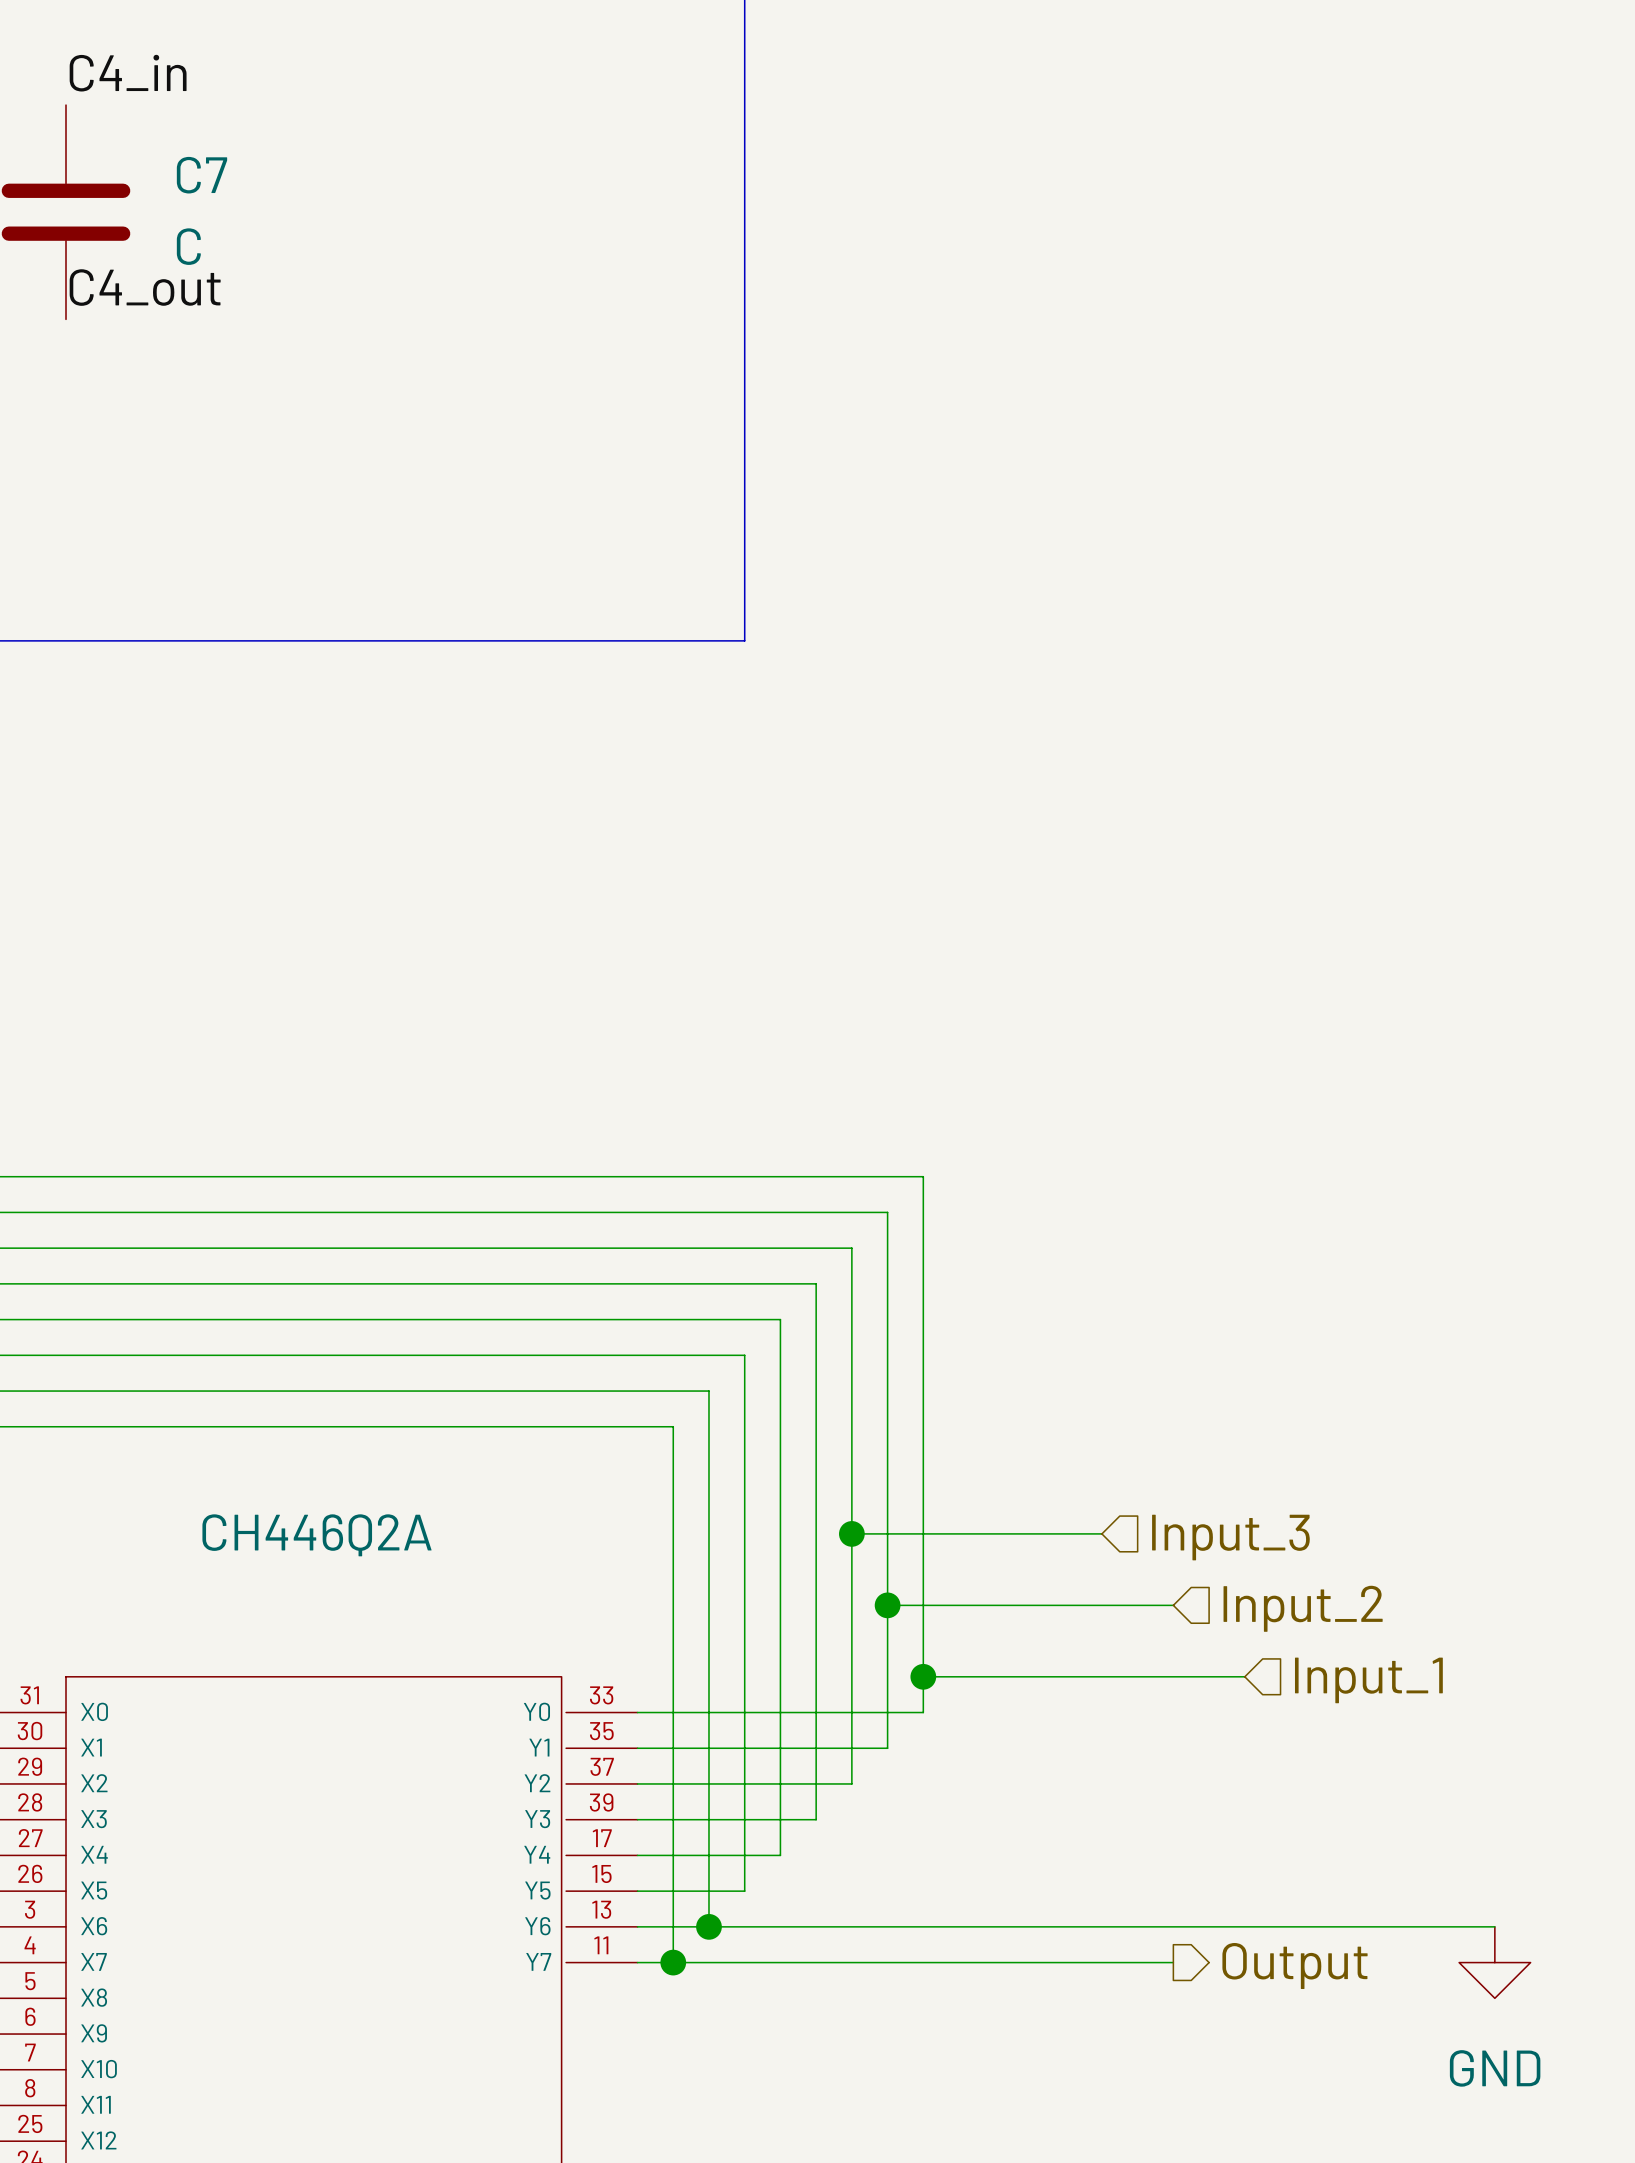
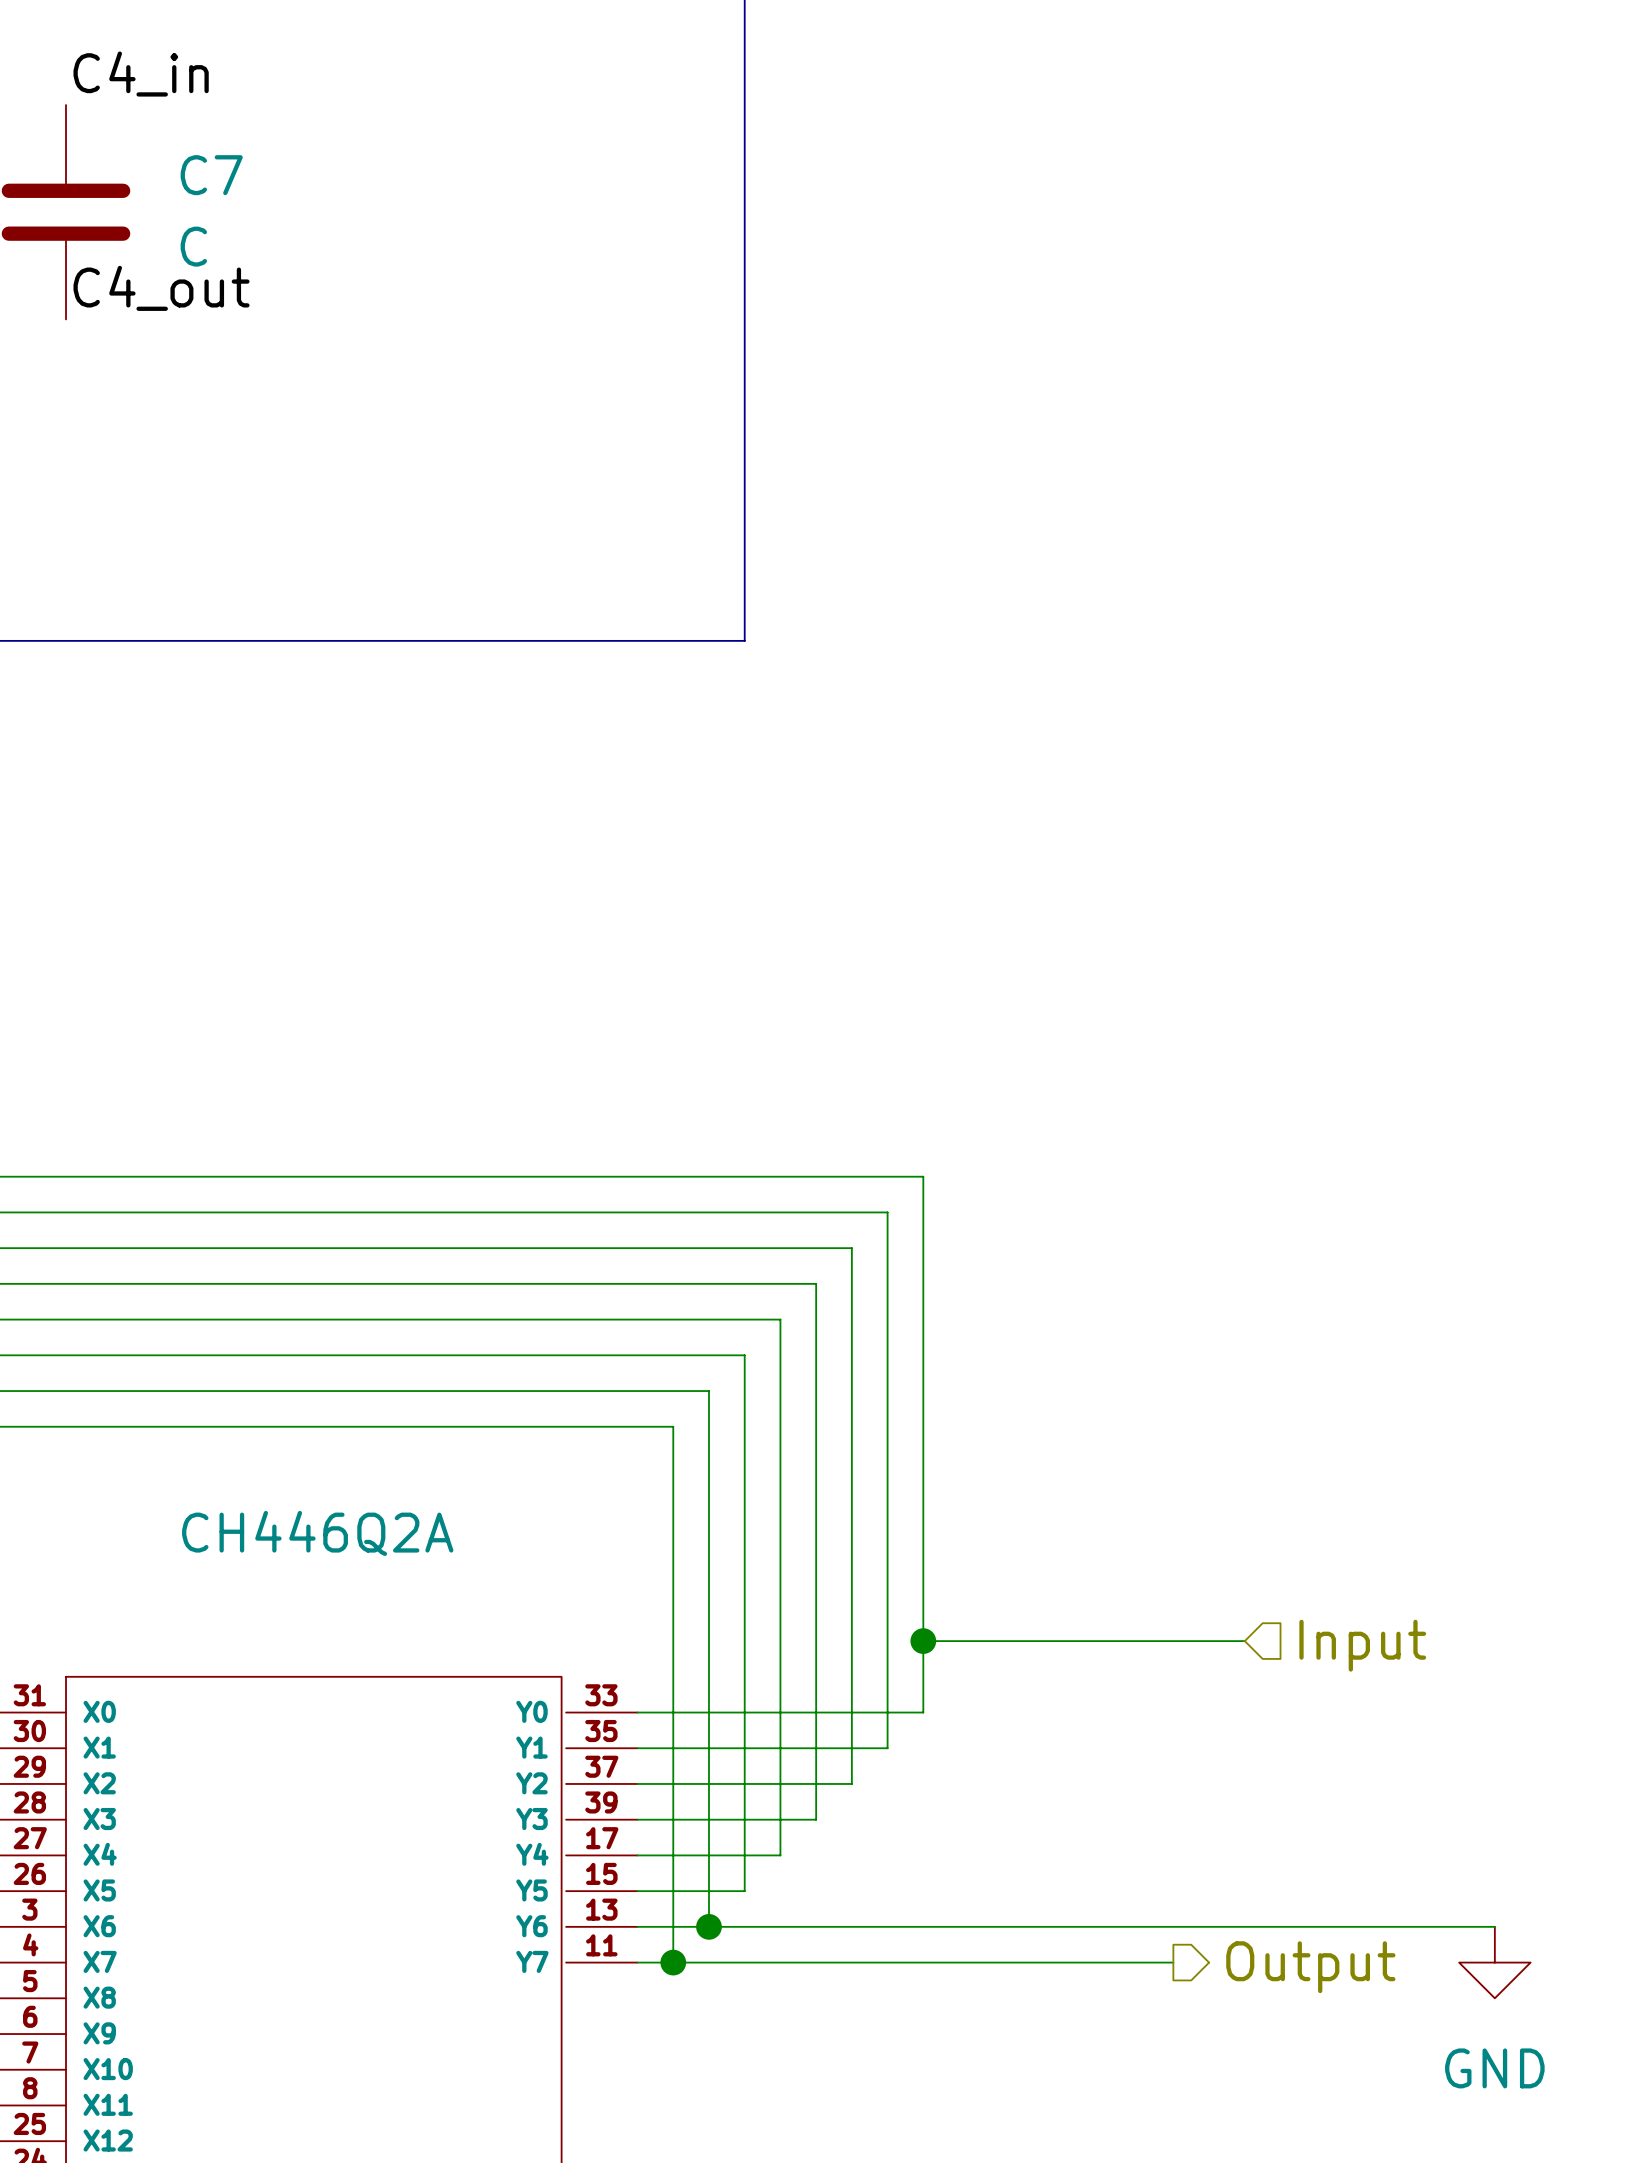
wire: (851, 1533) (1101, 1533) -> none
junction: (851, 1533) -> none
hierarchical label: Input_3 (1230, 1537) -> none
wire: (887, 1605) (1173, 1605) -> none
junction: (887, 1605) -> none
hierarchical label: Input_2 (1303, 1608) -> none
junction: none -> (923, 1641)
wire: (923, 1676) (1244, 1676) -> (923, 1641) (1244, 1641)
junction: (923, 1676) -> none
hierarchical label: Input_1 (1368, 1680) -> Input (1362, 1645)

